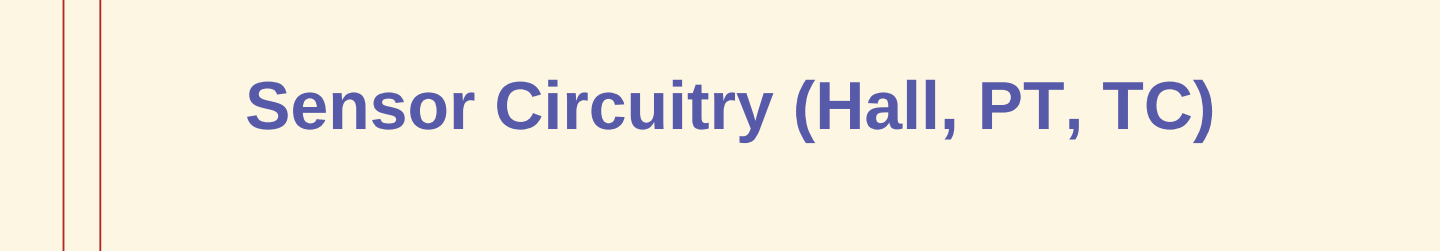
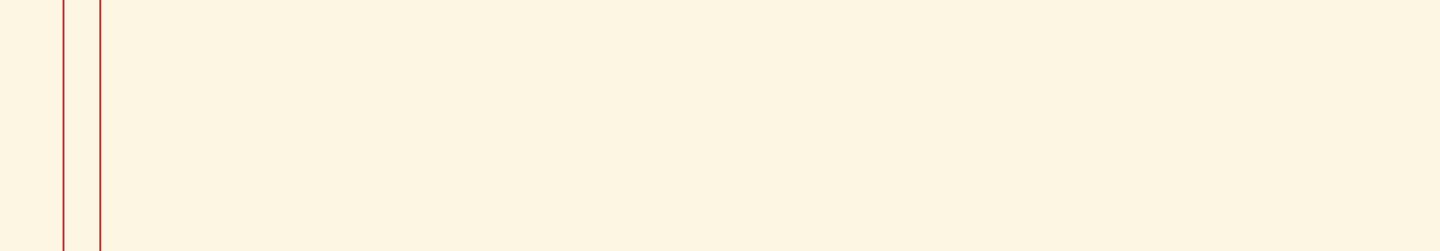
text: Sensor Circuitry (Hall, PT, TC) (729, 111) -> none

